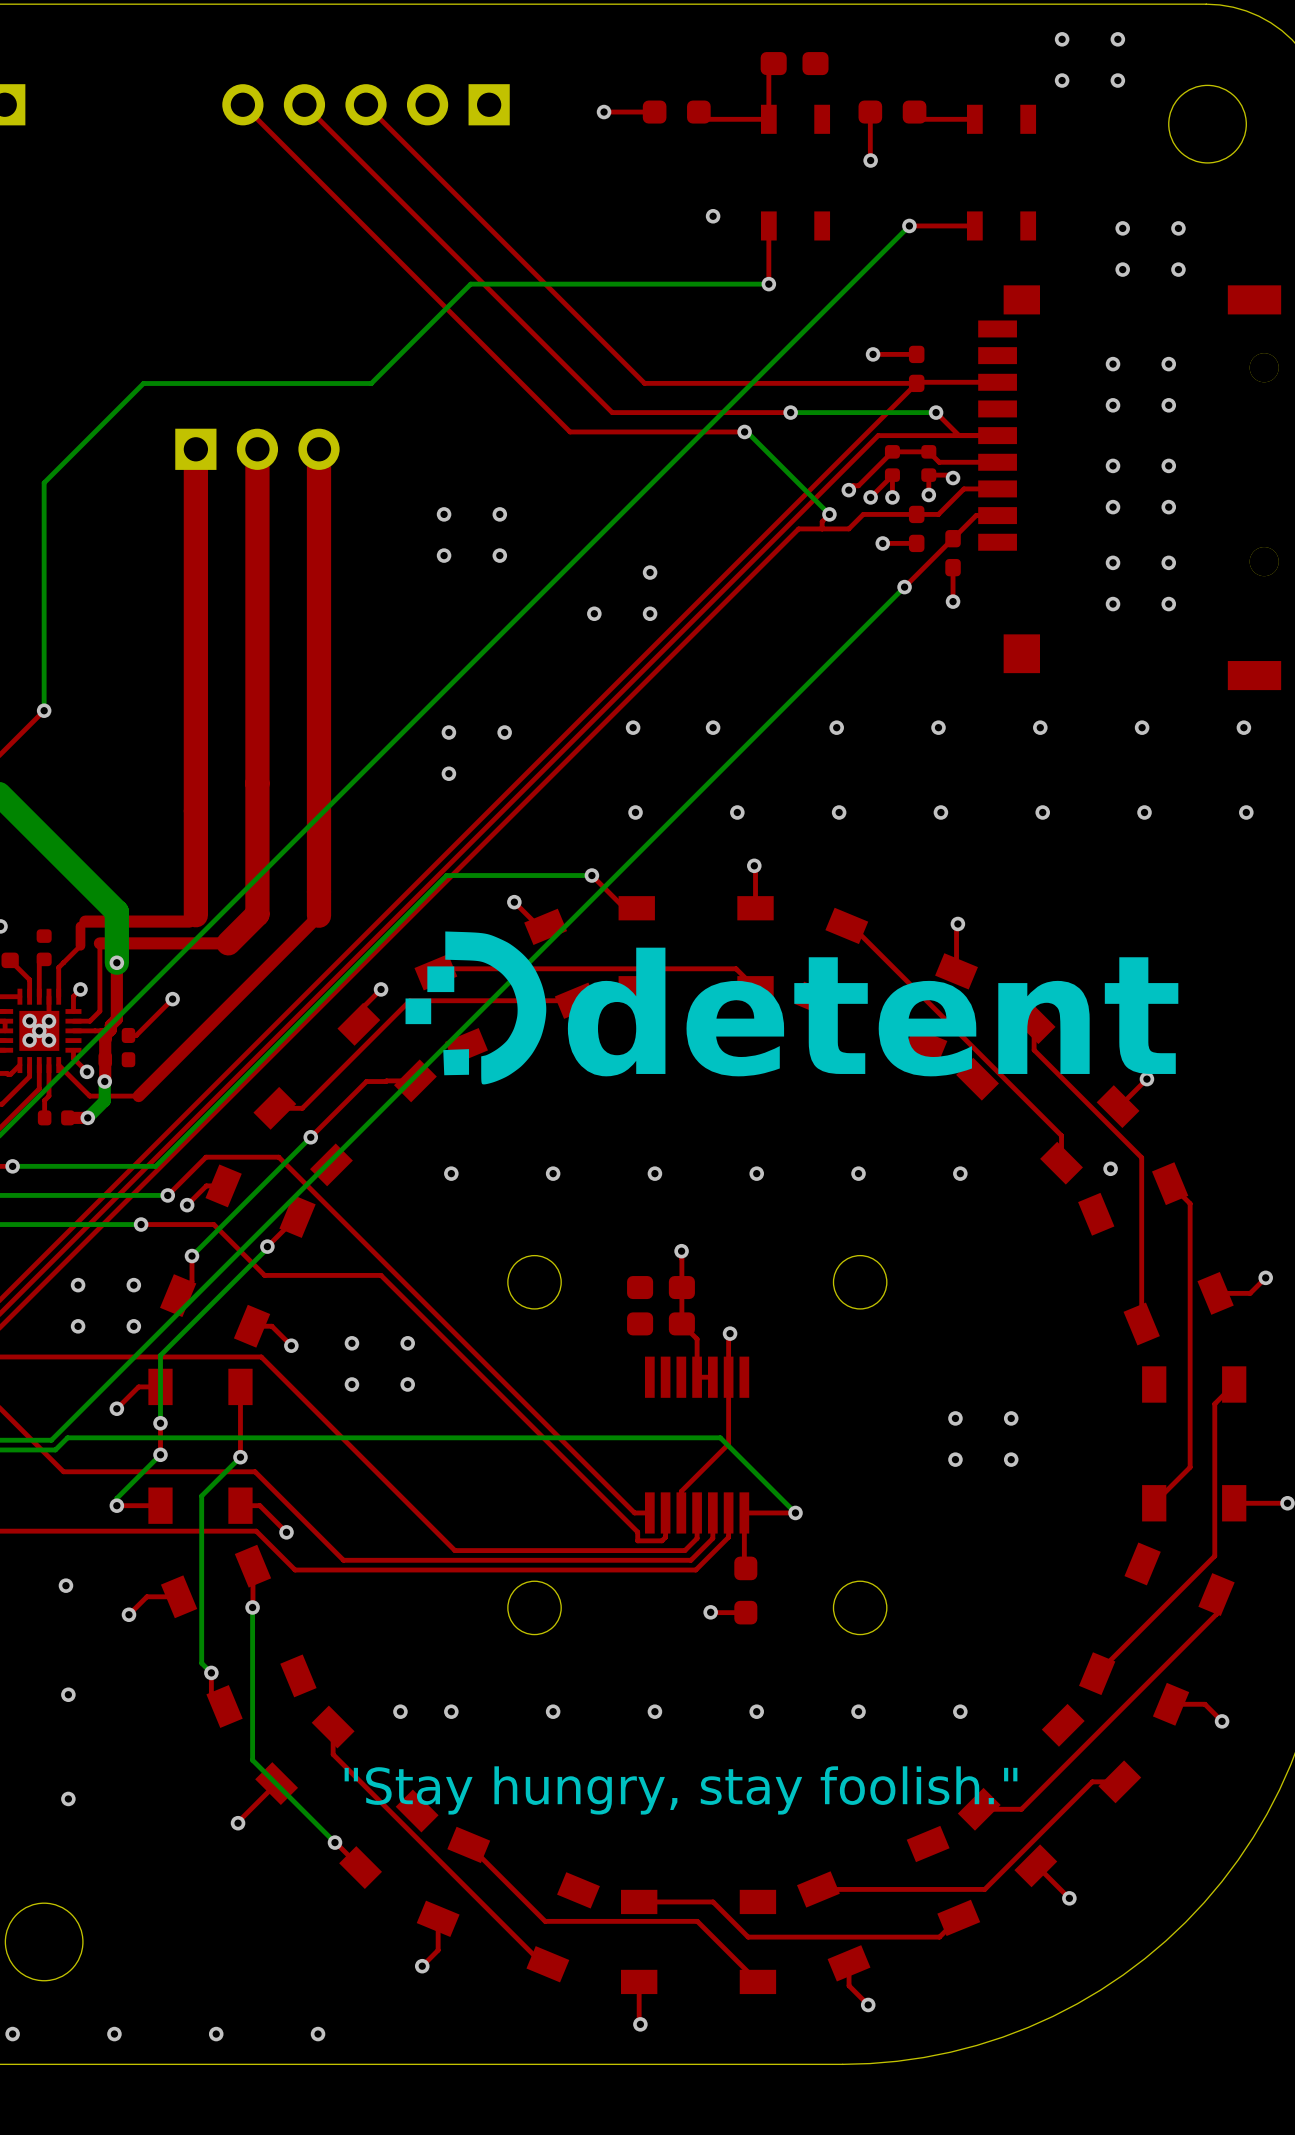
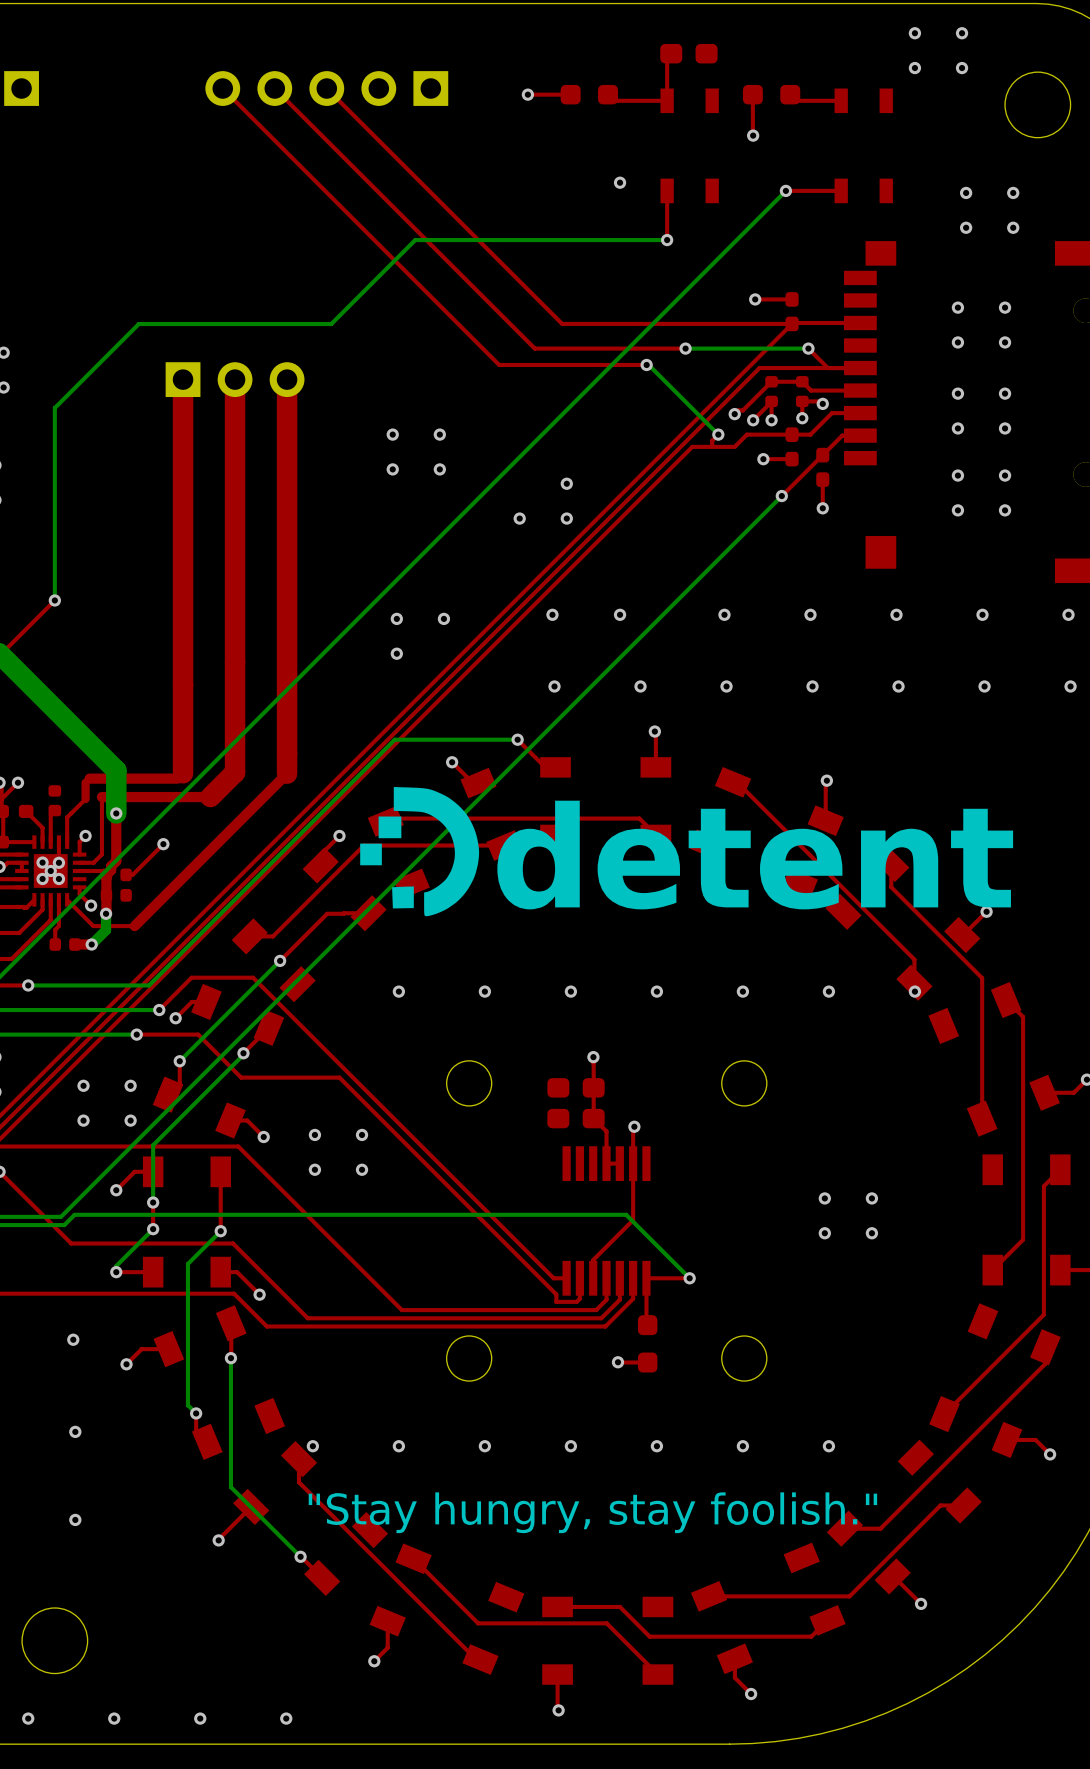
via position: (1110, 1168) -> (914, 991)
via position: (400, 1711) -> (312, 1446)

